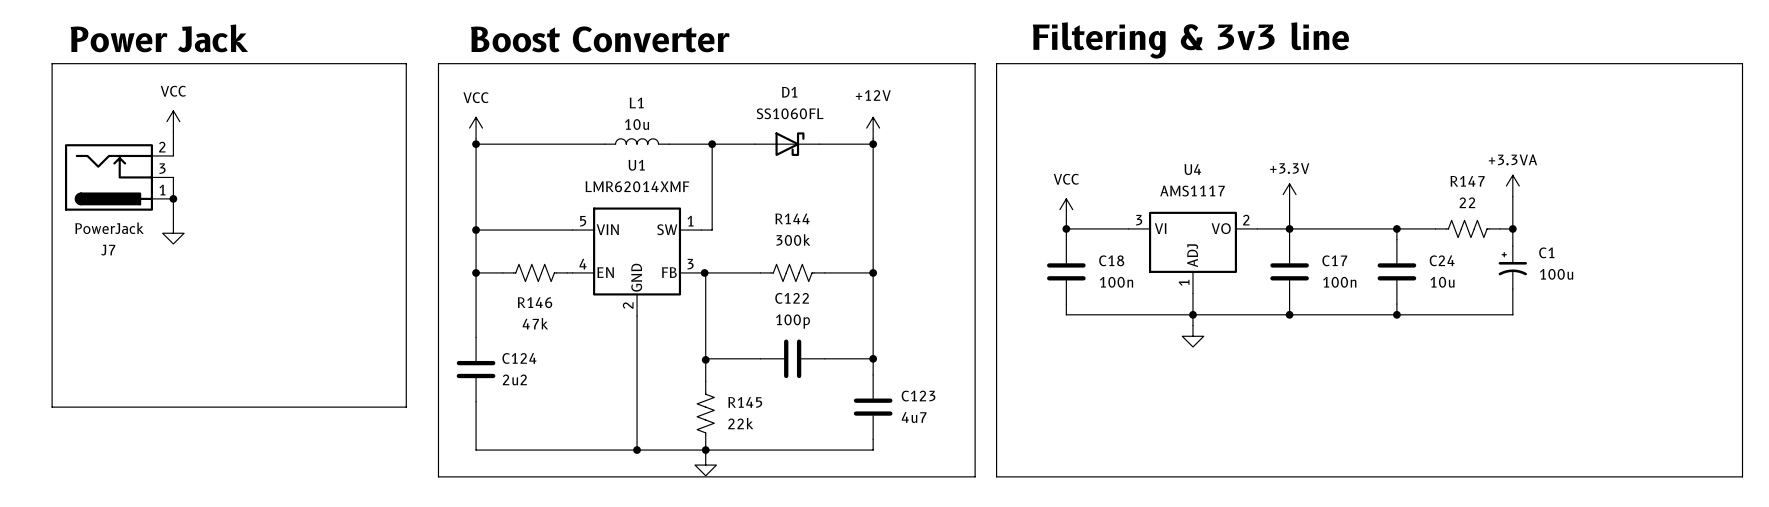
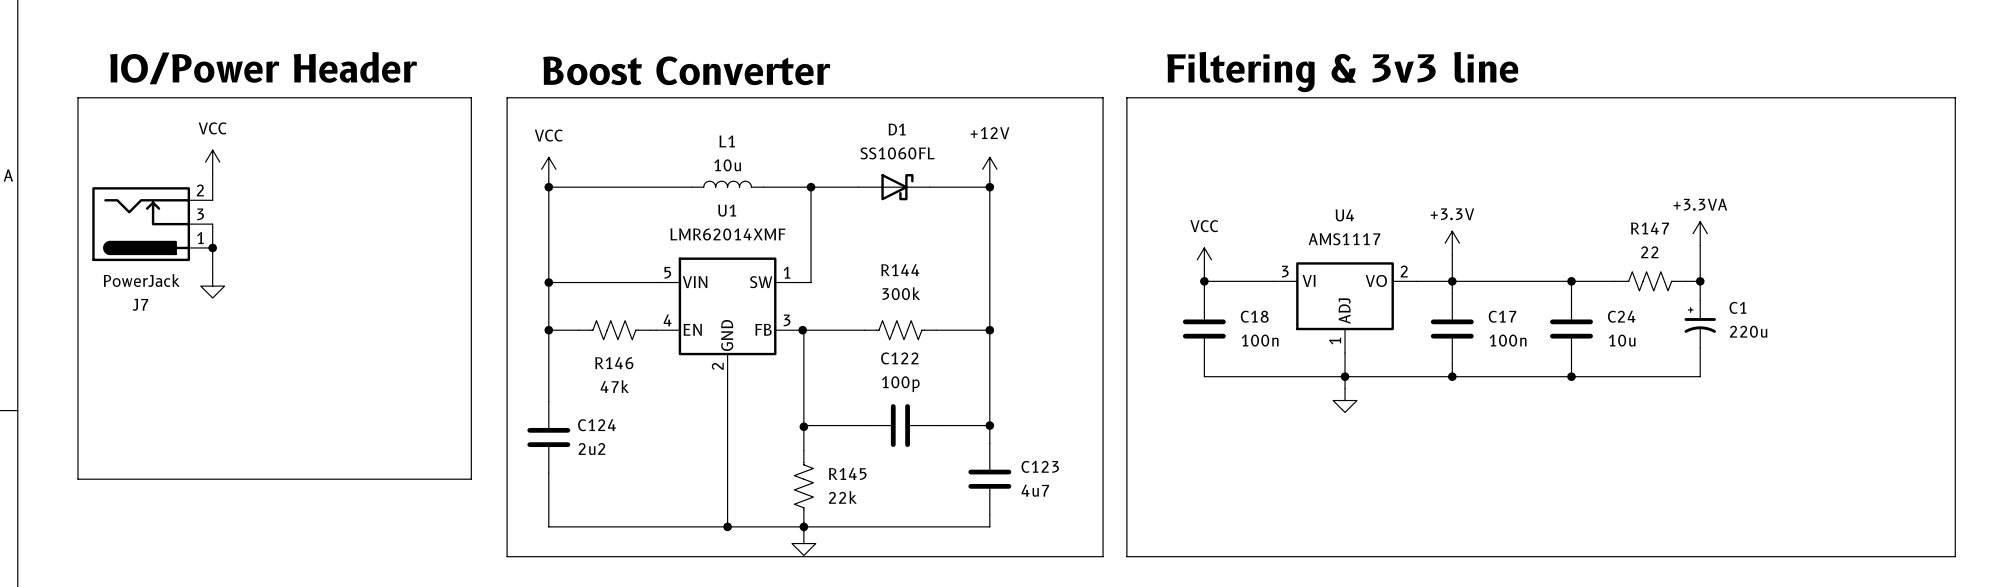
text: none -> IO/Power Header (263, 68)
text: Power Jack (159, 38) -> none
C1 value: 100u (1556, 274) -> 220u (1748, 331)

